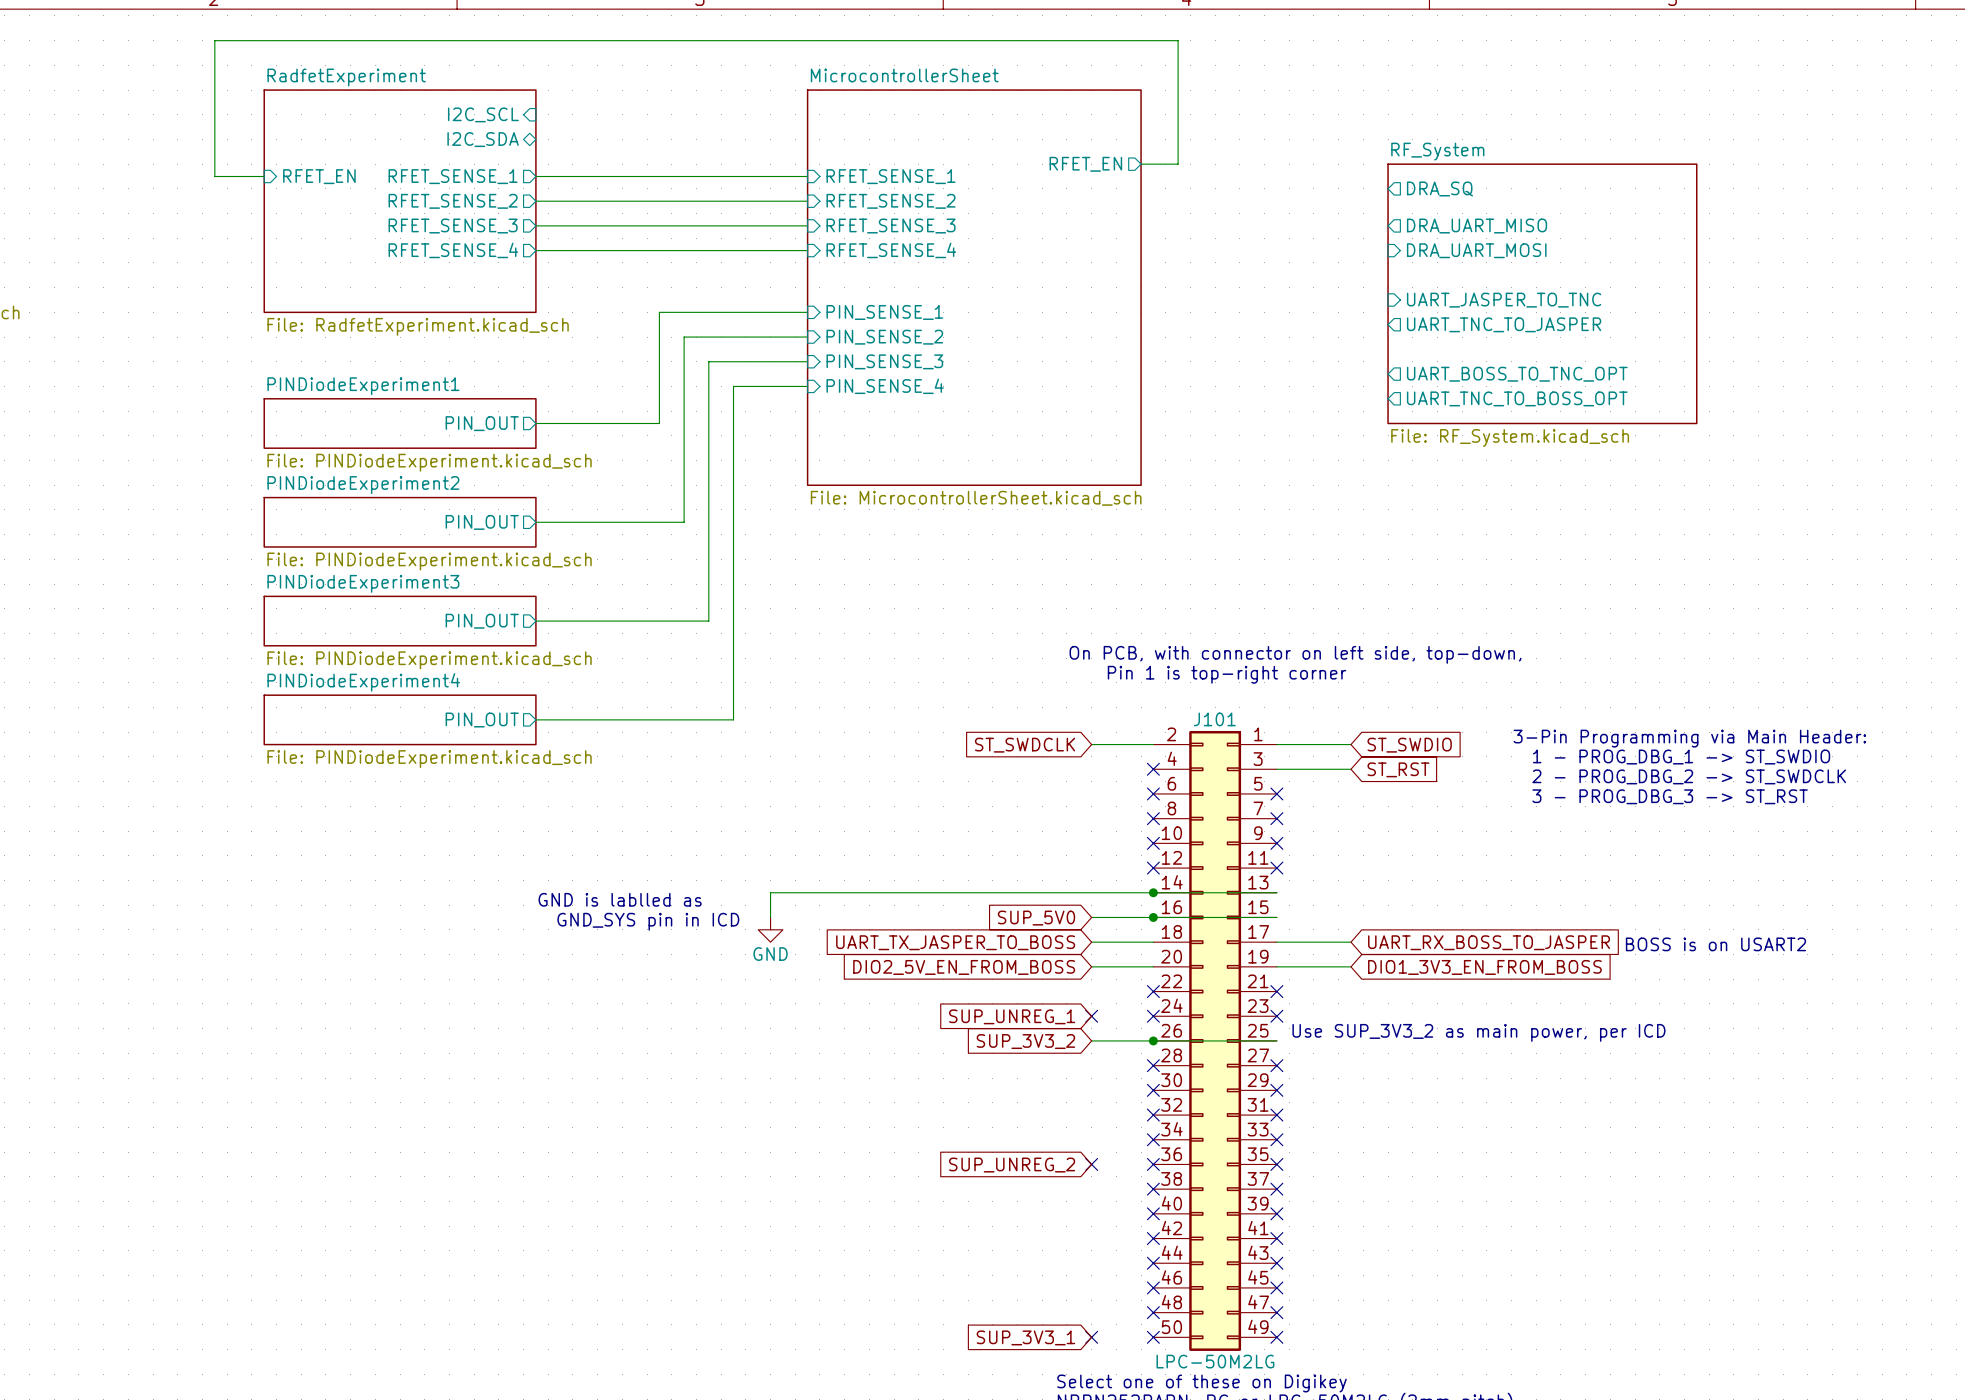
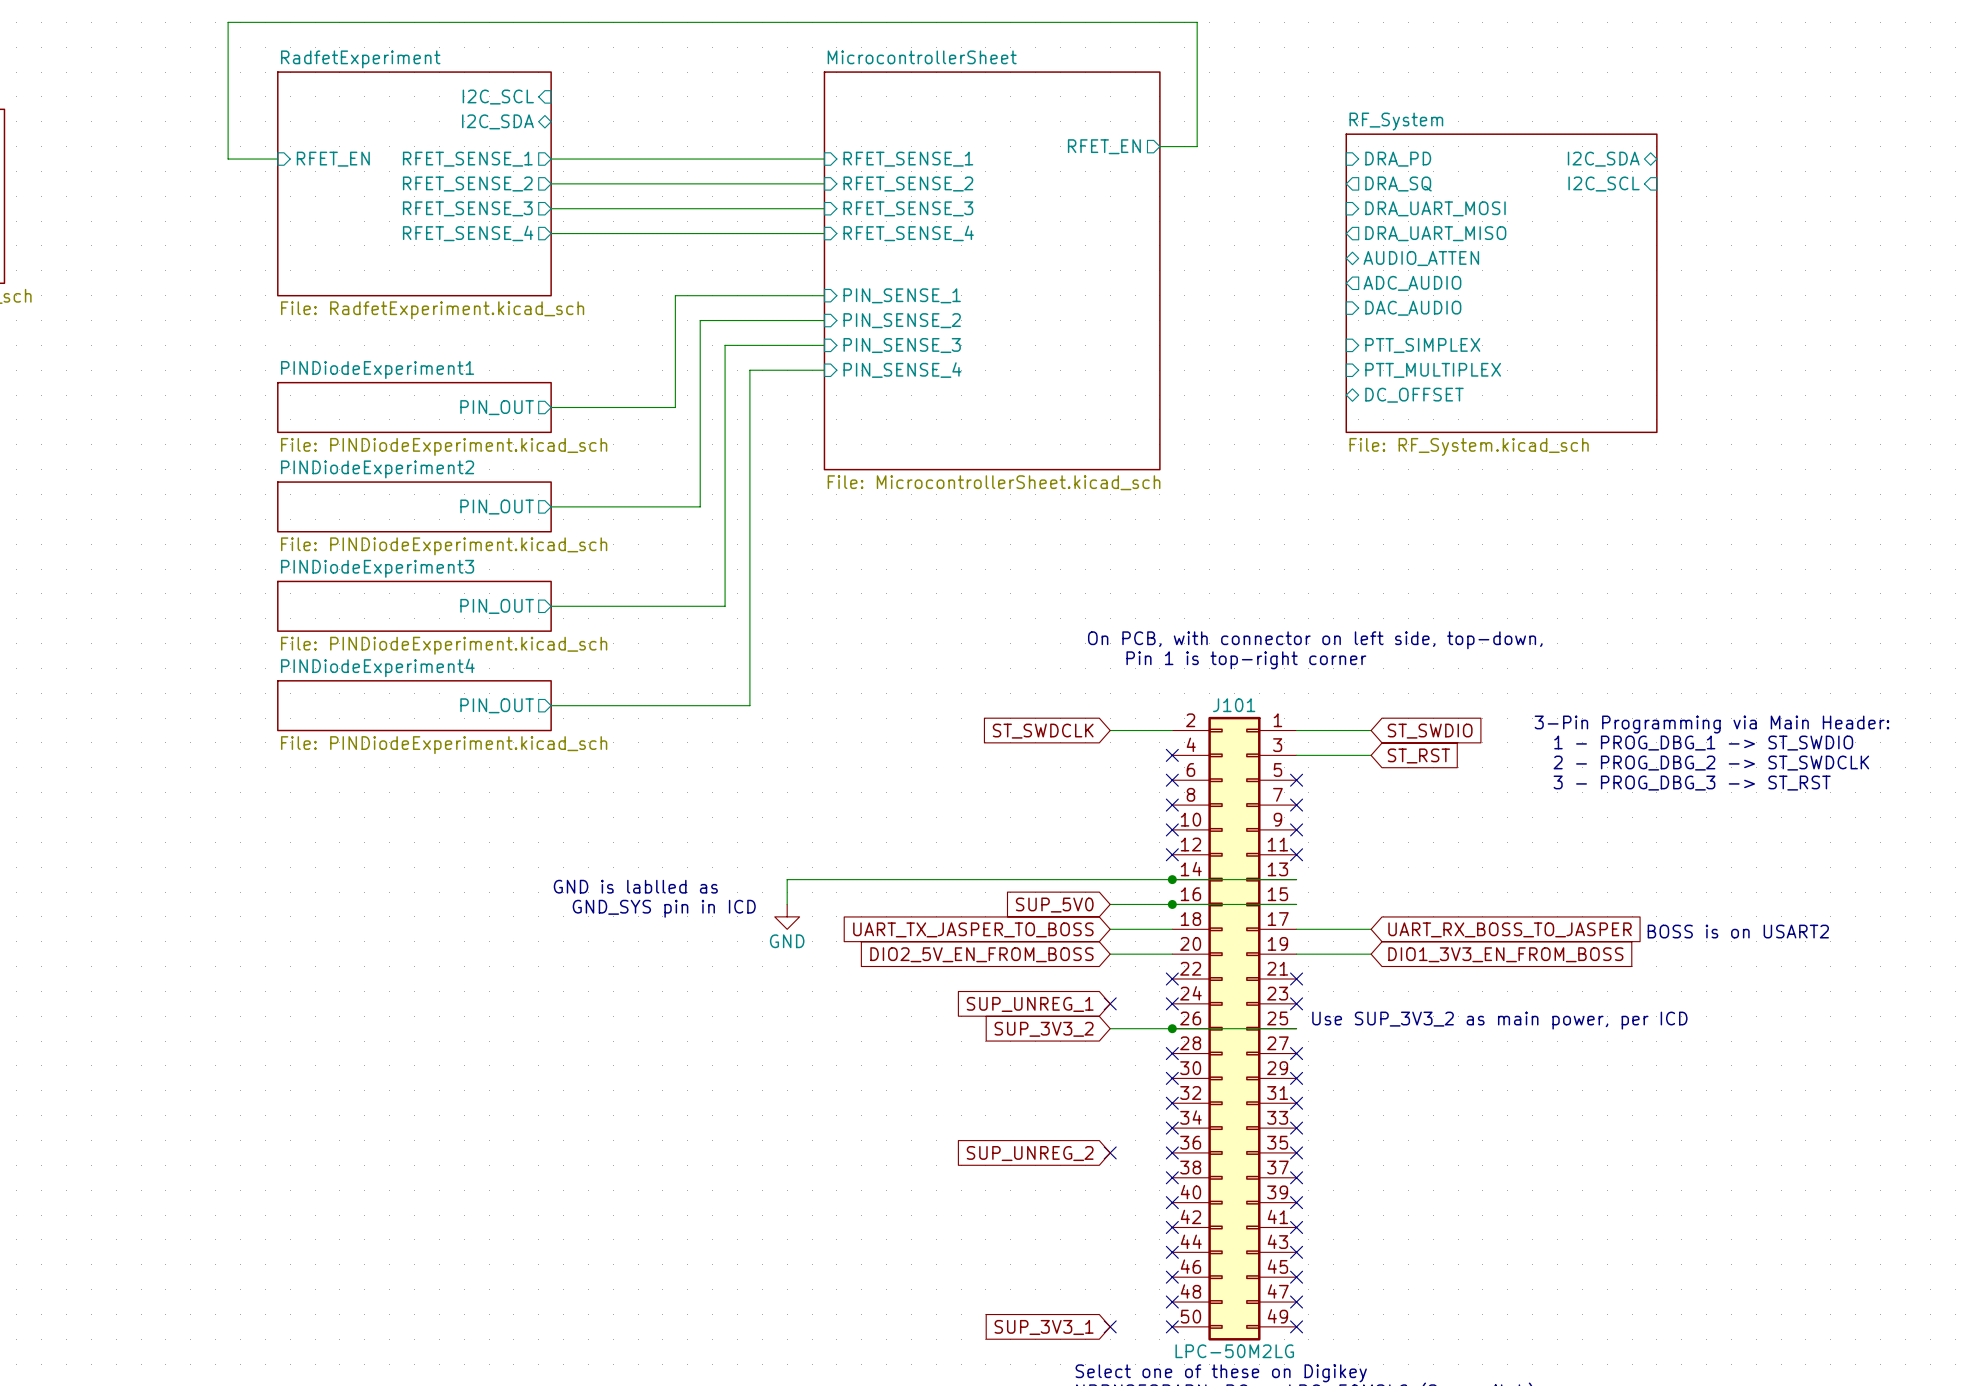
sheet pin: none -> DRA_PD (1398, 159)
sheet pin: none -> I2C_SDA (1603, 159)
sheet pin position: DRA_SQ (1439, 188) -> DRA_SQ (1398, 184)
sheet pin: none -> I2C_SCL (1604, 184)
sheet pin position: DRA_UART_MISO (1477, 226) -> DRA_UART_MISO (1435, 233)
sheet pin position: DRA_UART_MOSI (1476, 250) -> DRA_UART_MOSI (1435, 208)
sheet pin: none -> AUDIO_ATTEN (1421, 258)
sheet RF_System: File: RF_System.kicad_sch (1542, 293) -> none
sheet RF_System: none -> File: RF_System.kicad_sch (1501, 283)
sheet pin: none -> ADC_AUDIO (1412, 283)
sheet pin: UART_JASPER_TO_TNC (1504, 300) -> none
sheet pin: none -> DAC_AUDIO (1413, 308)
sheet pin: UART_TNC_TO_JASPER (1504, 324) -> none
sheet pin: none -> PTT_SIMPLEX (1422, 345)
sheet pin: UART_BOSS_TO_TNC_OPT (1517, 374) -> none
sheet pin: none -> PTT_MULTIPLEX (1433, 370)
sheet pin: UART_TNC_TO_BOSS_OPT (1517, 398) -> none
sheet pin: none -> DC_OFFSET (1414, 395)

